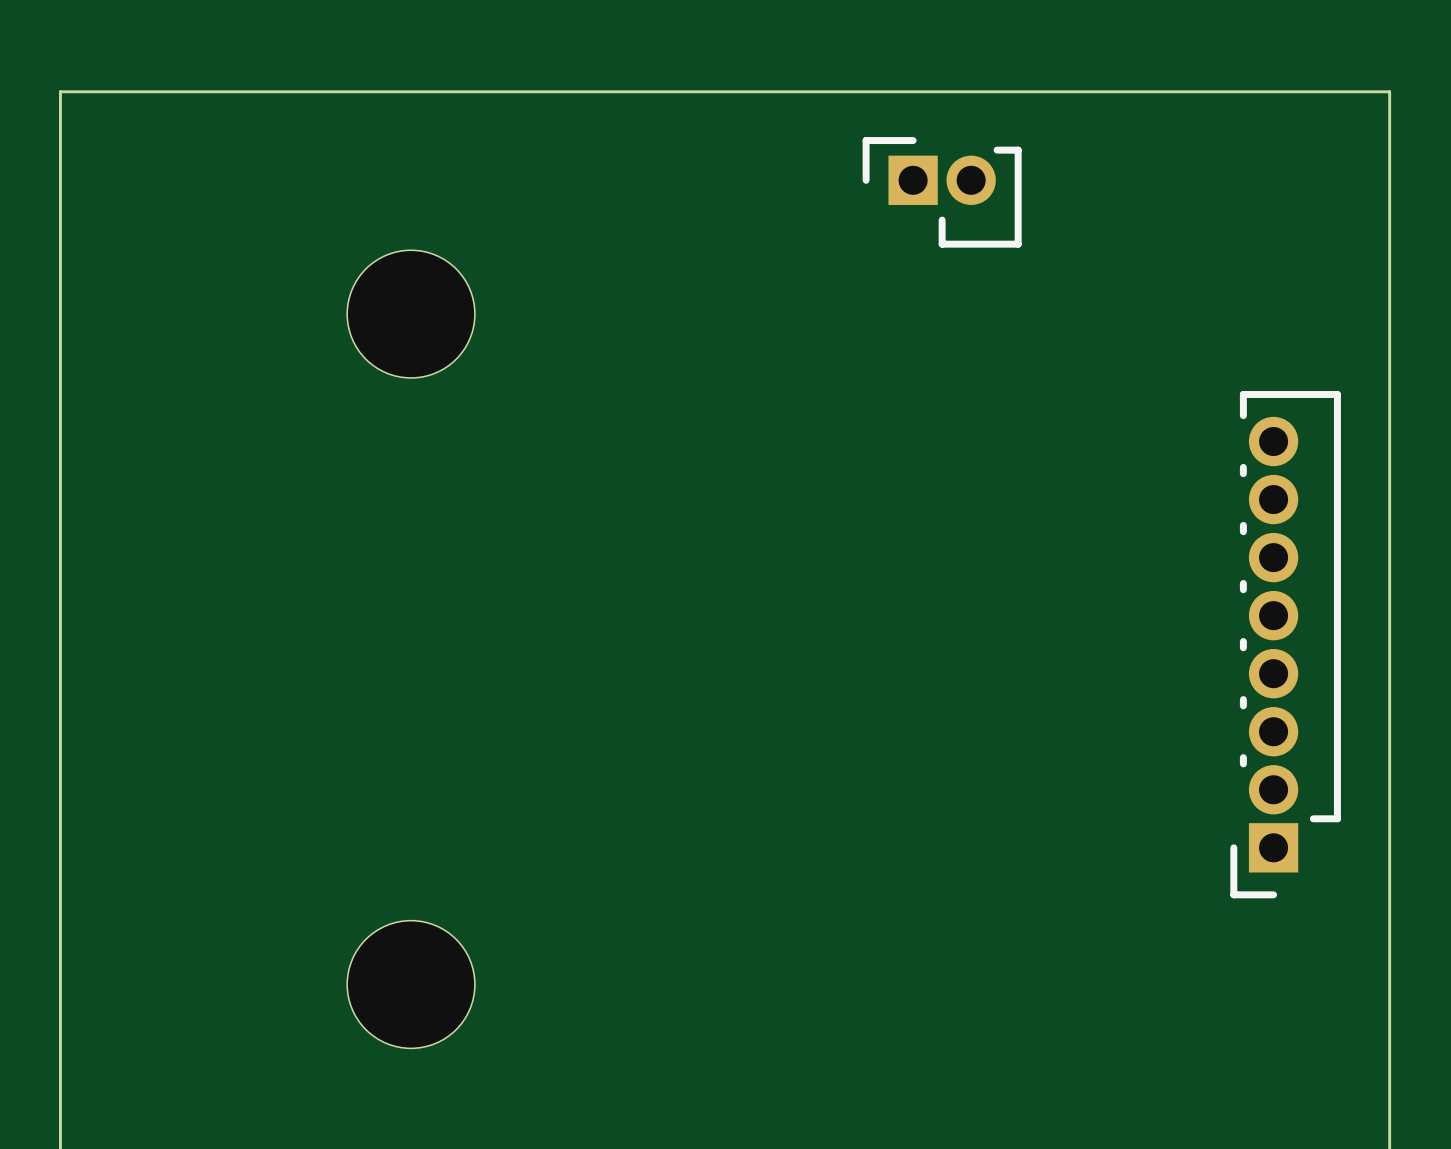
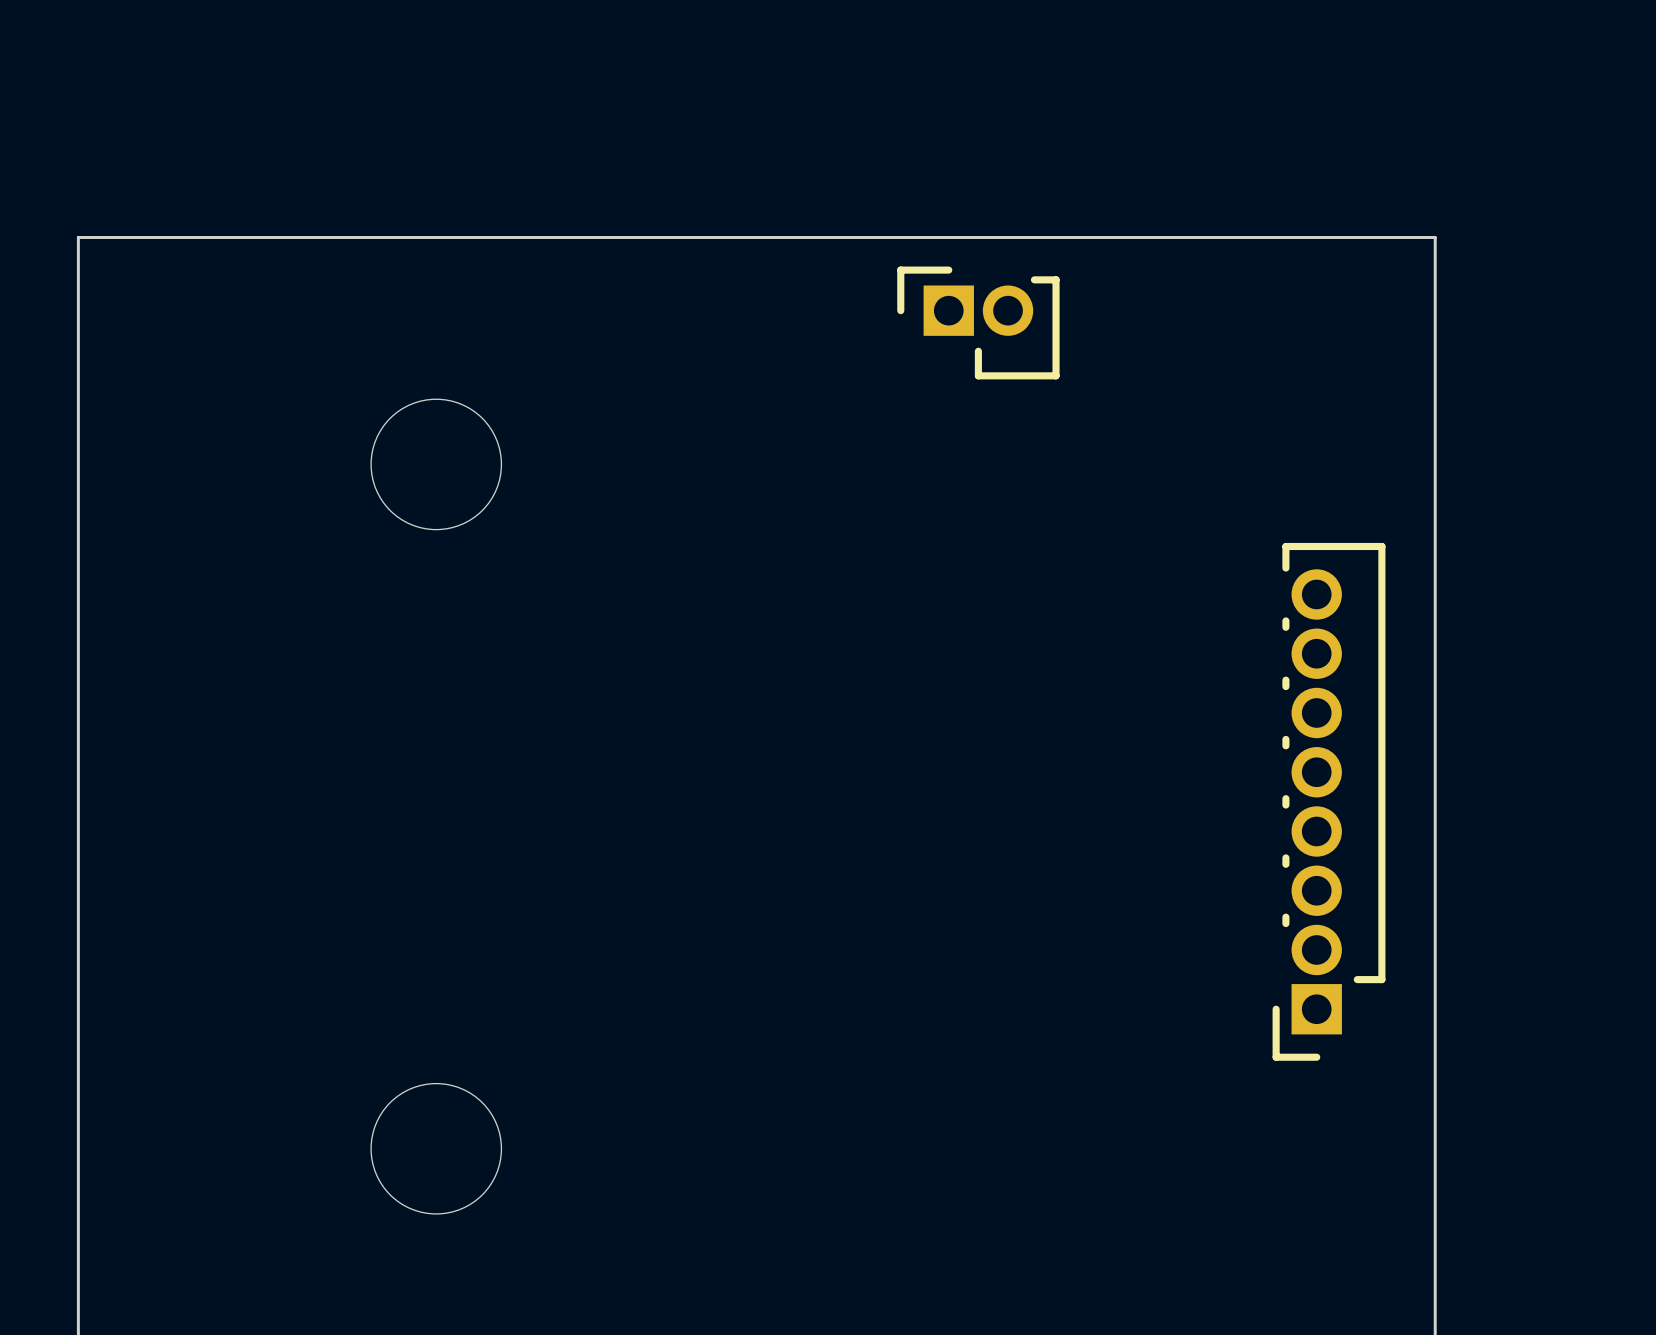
part position: (942, 192) -> (978, 322)

